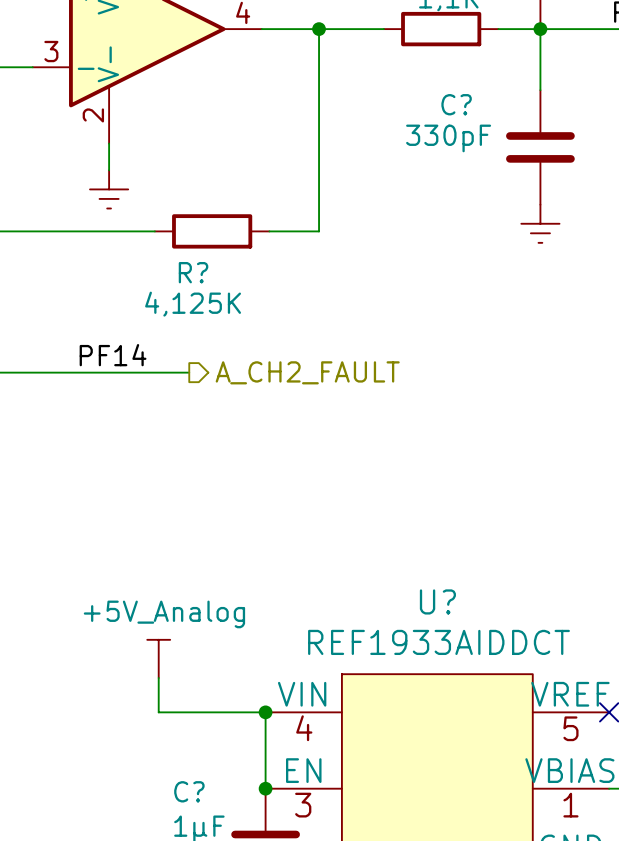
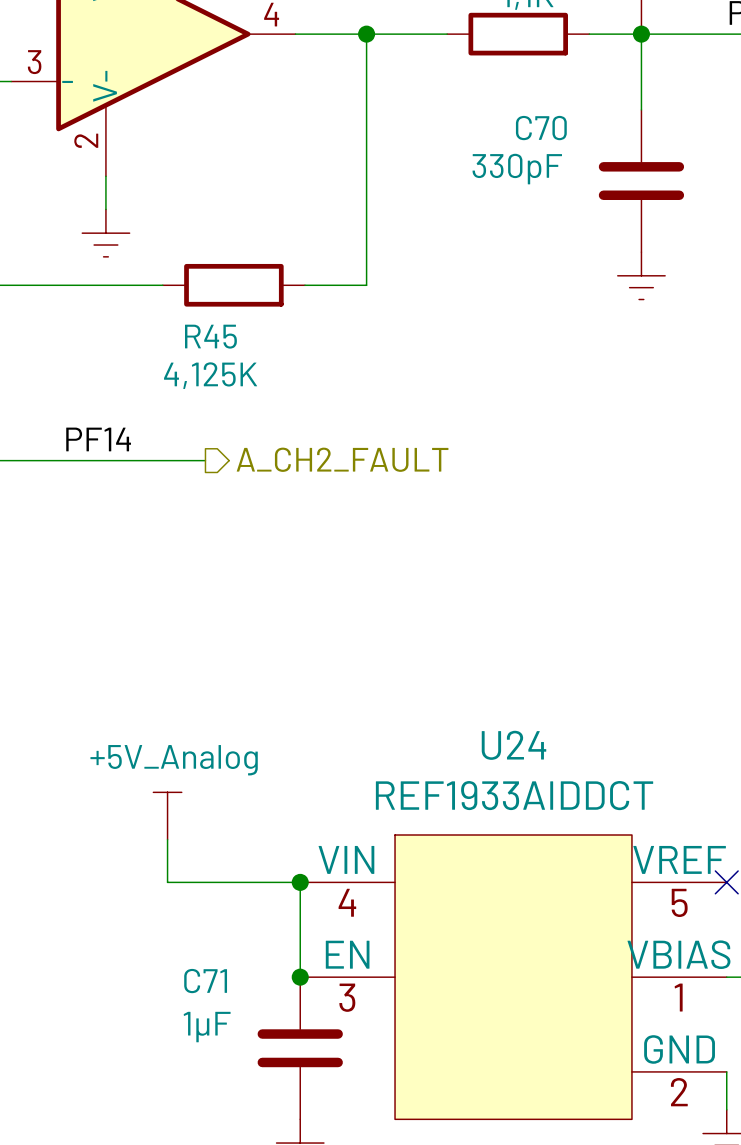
C? name: C? (456, 104) -> C70 (541, 128)
R? name: R? (193, 272) -> R45 (210, 336)
U? name: U? (437, 601) -> U24 (514, 745)
C? name: C? (189, 791) -> C71 (205, 981)

